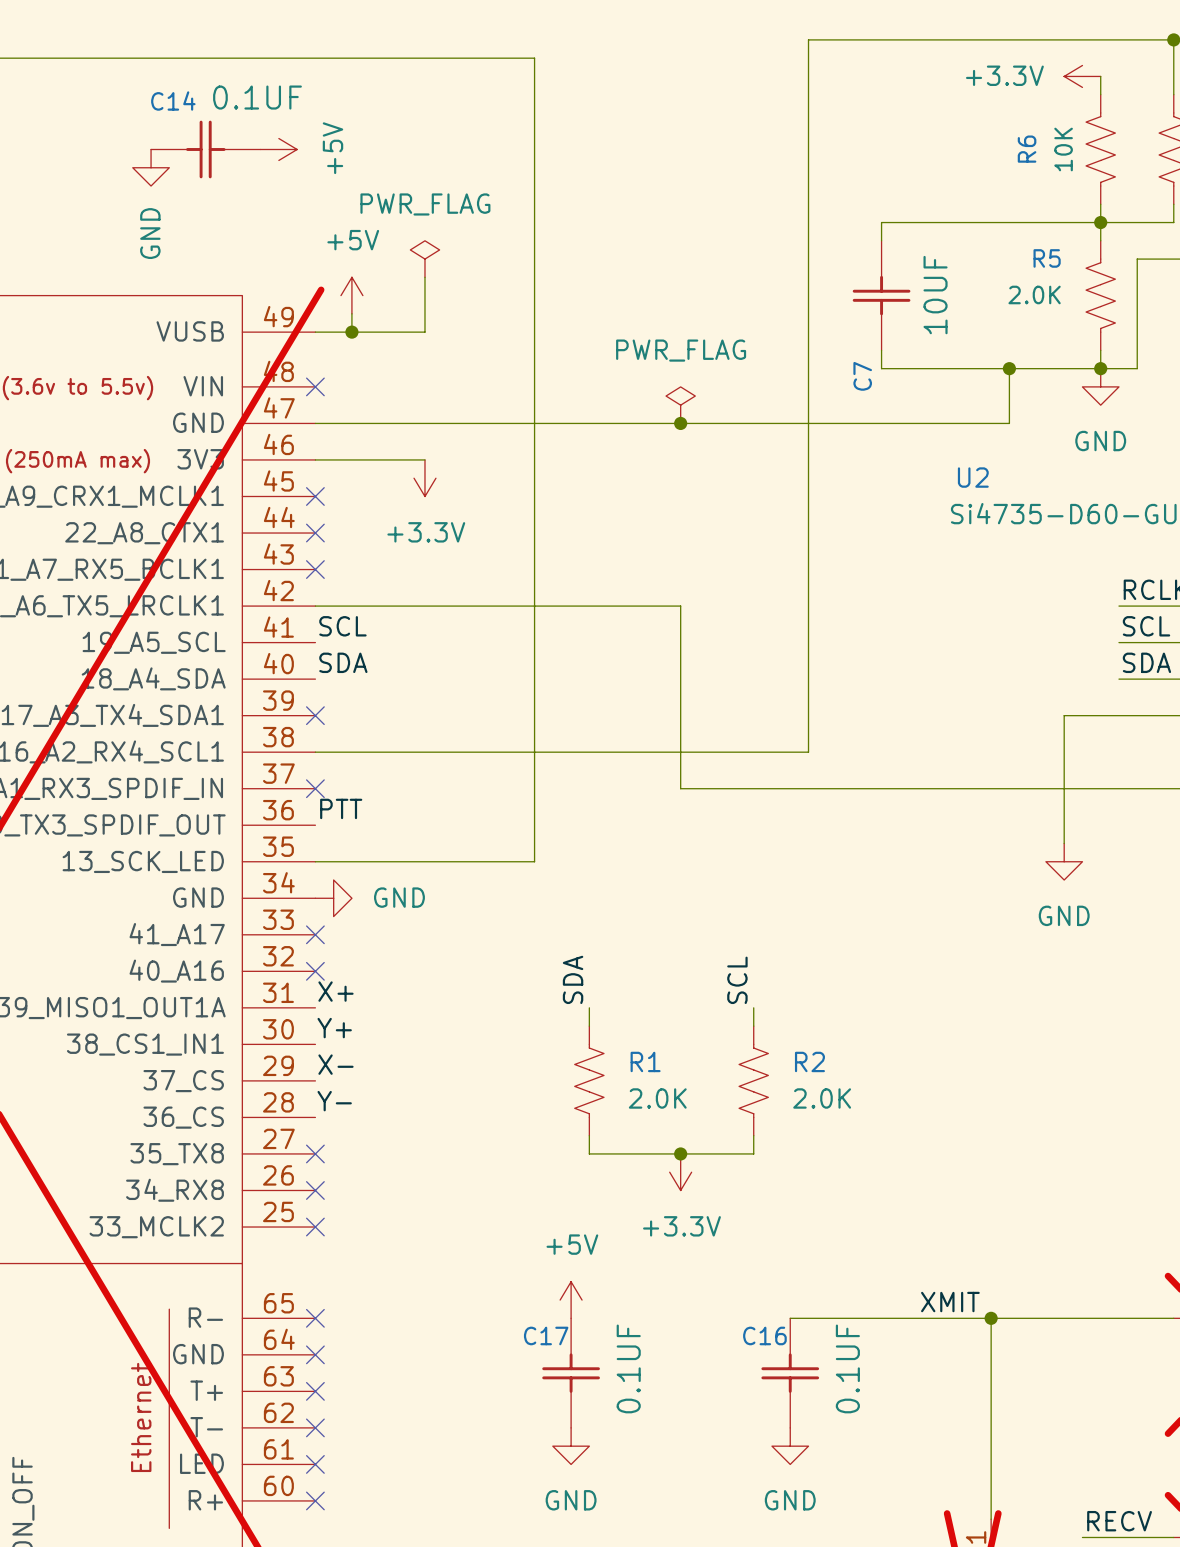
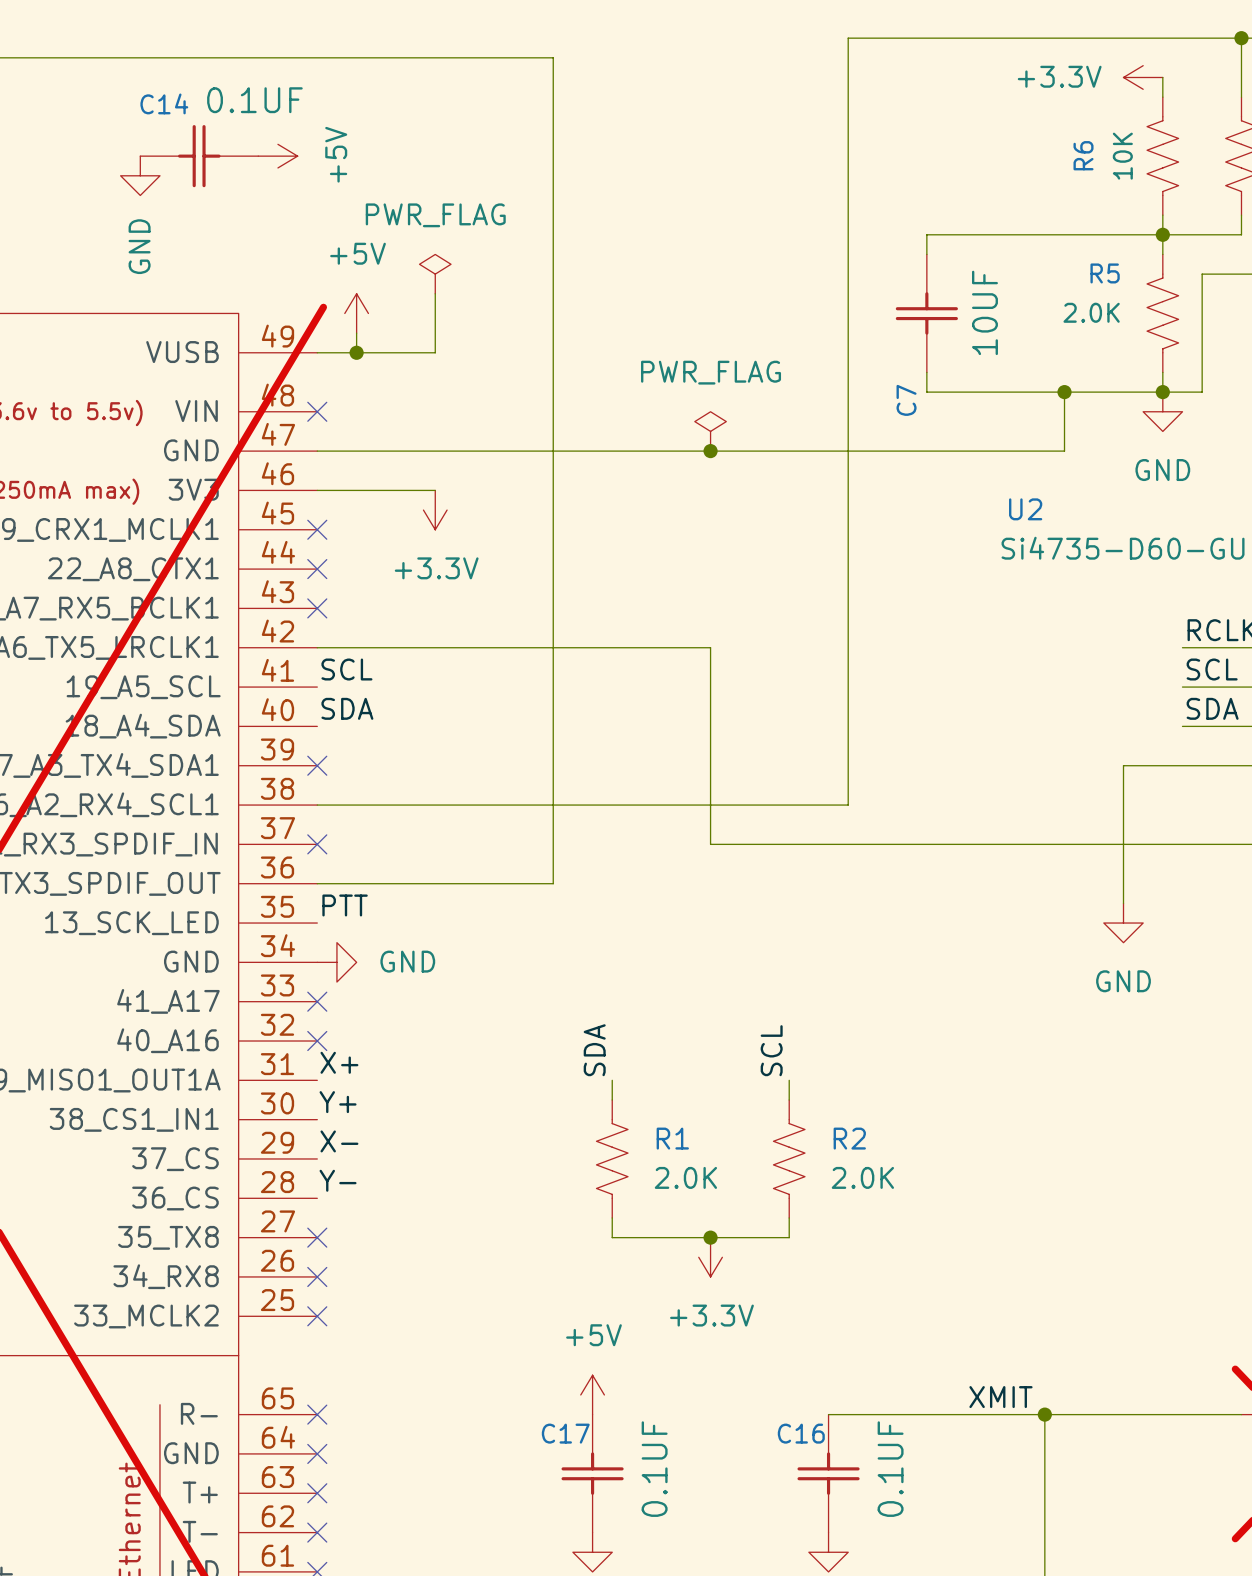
label position: PTT (341, 808) -> PTT (345, 905)
wire: (534, 825) (534, 861) (315, 861) -> (553, 883) (317, 883)

